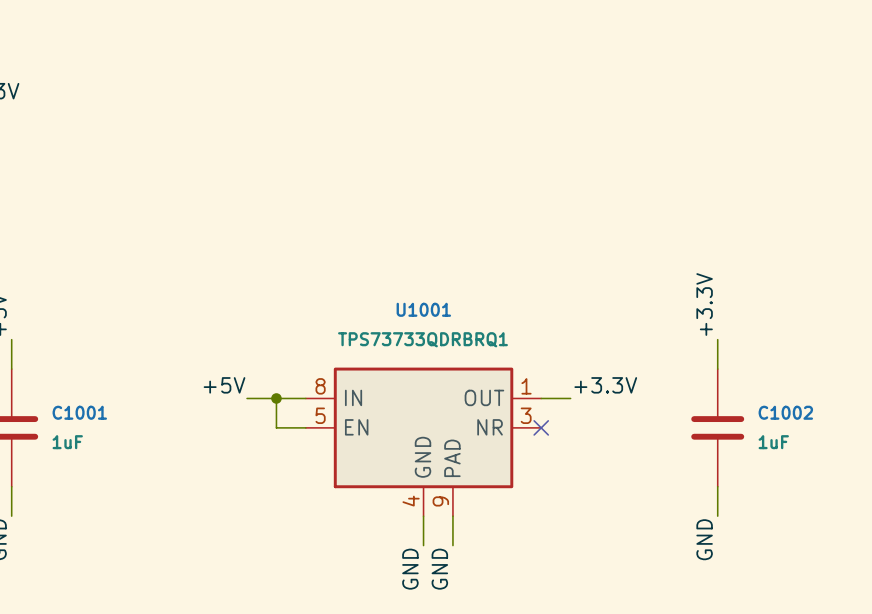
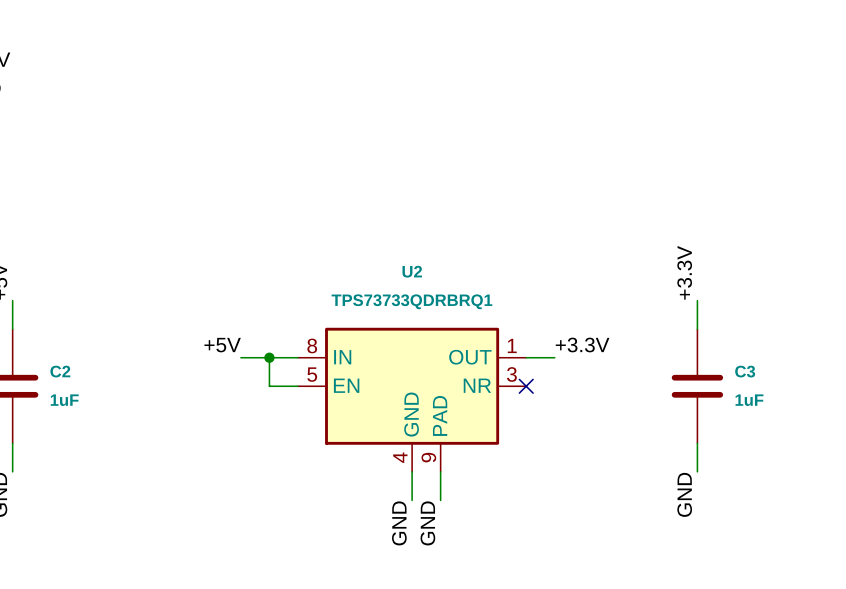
U1001 name: U1001 (423, 309) -> U2 (412, 271)
C1001 name: C1001 (79, 412) -> C2 (60, 371)
C1002 name: C1002 (785, 412) -> C3 (745, 371)

